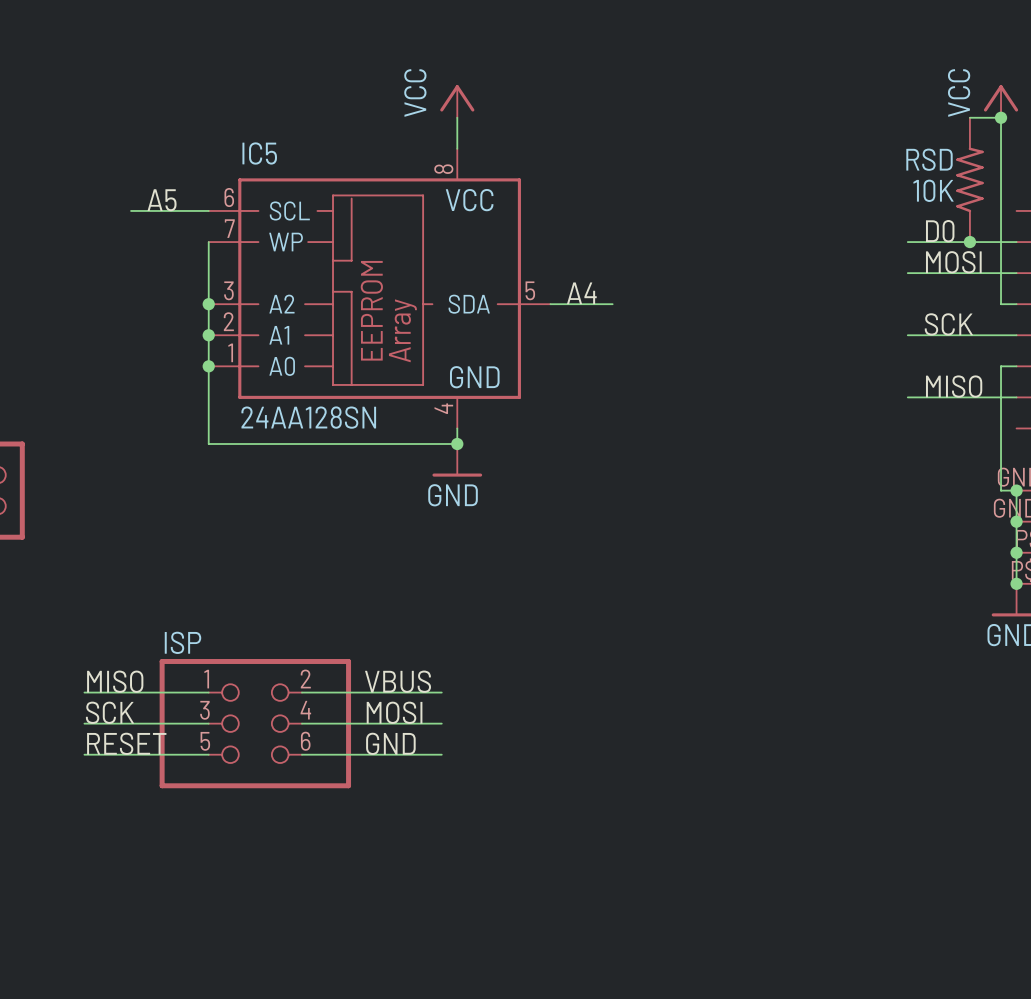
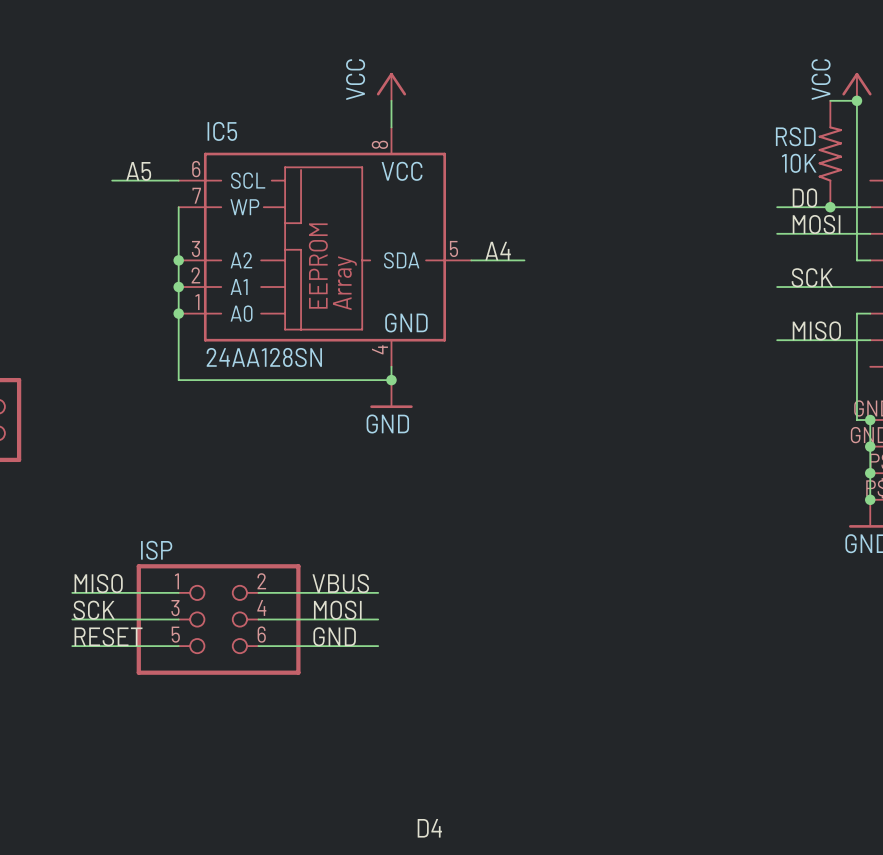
label: none -> D4 (429, 828)

